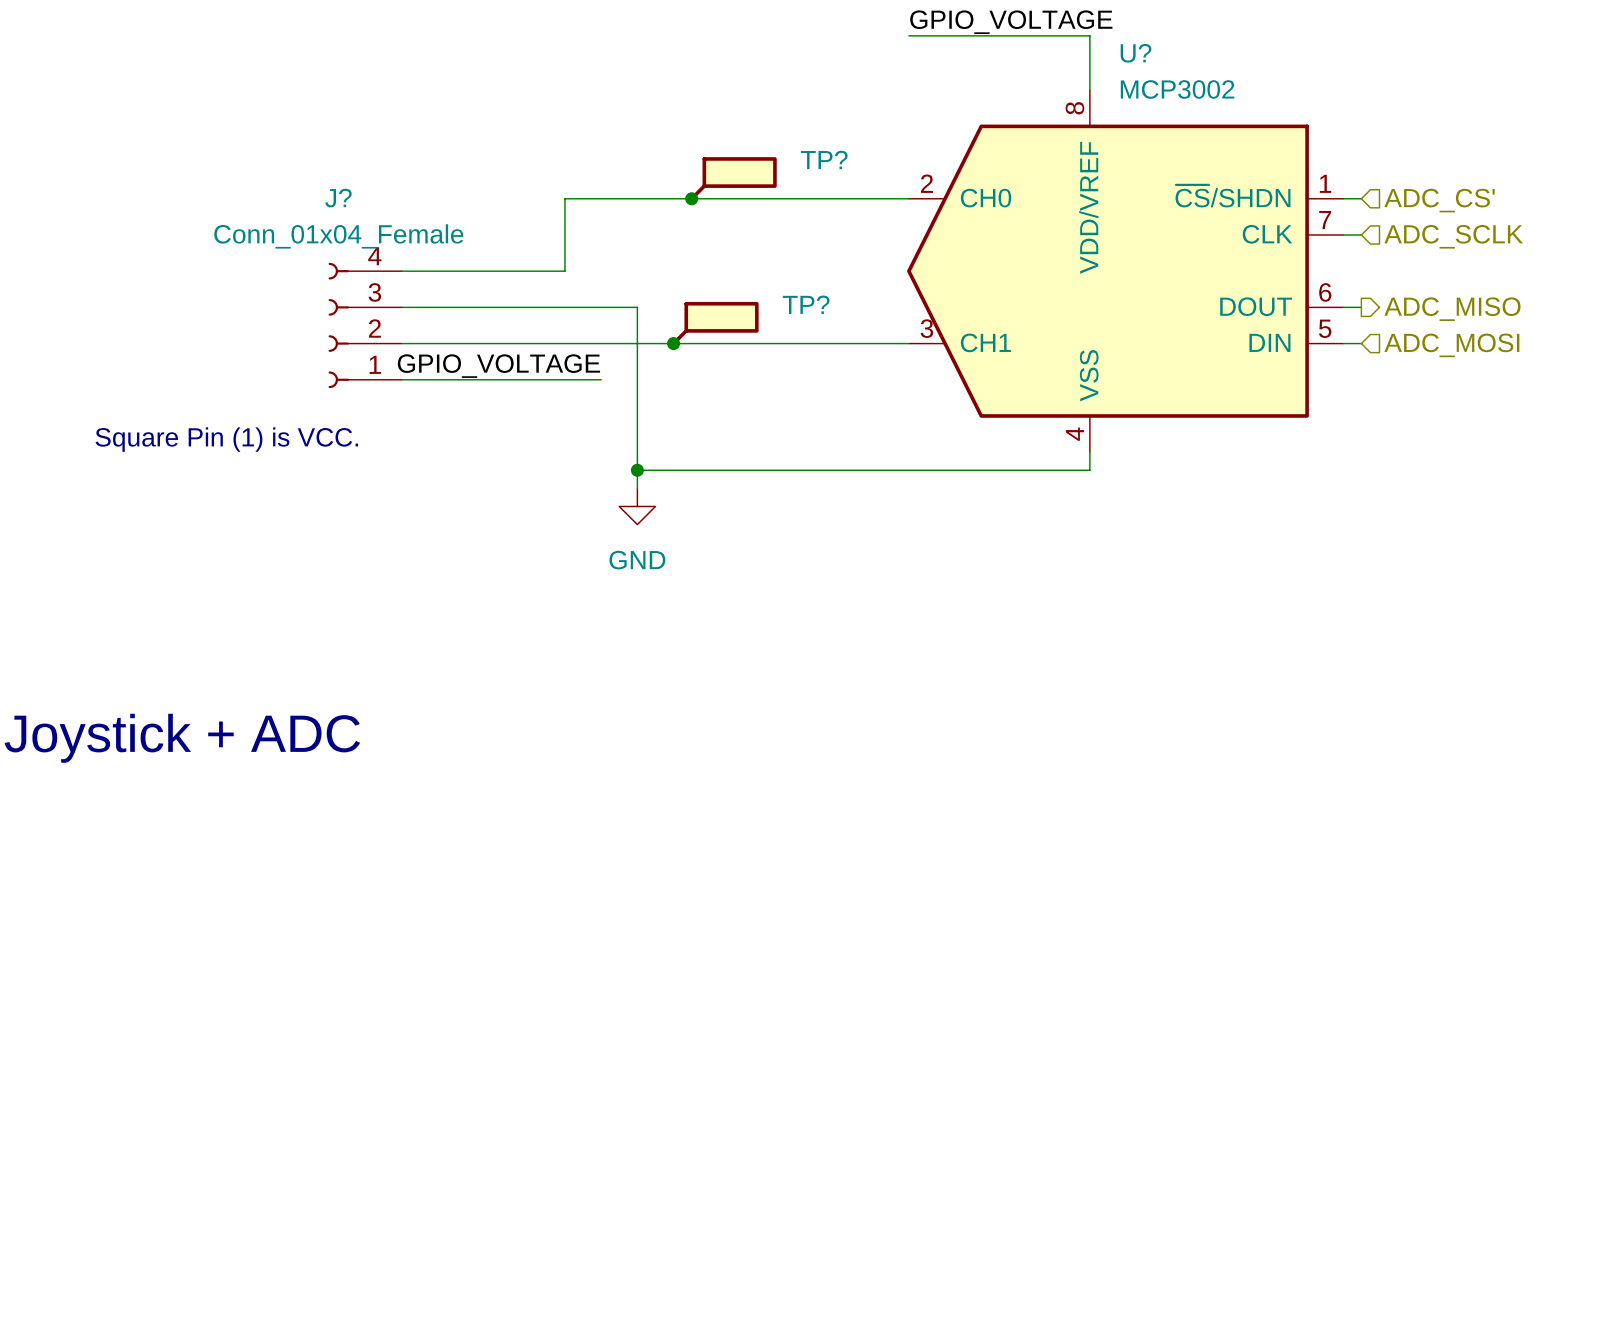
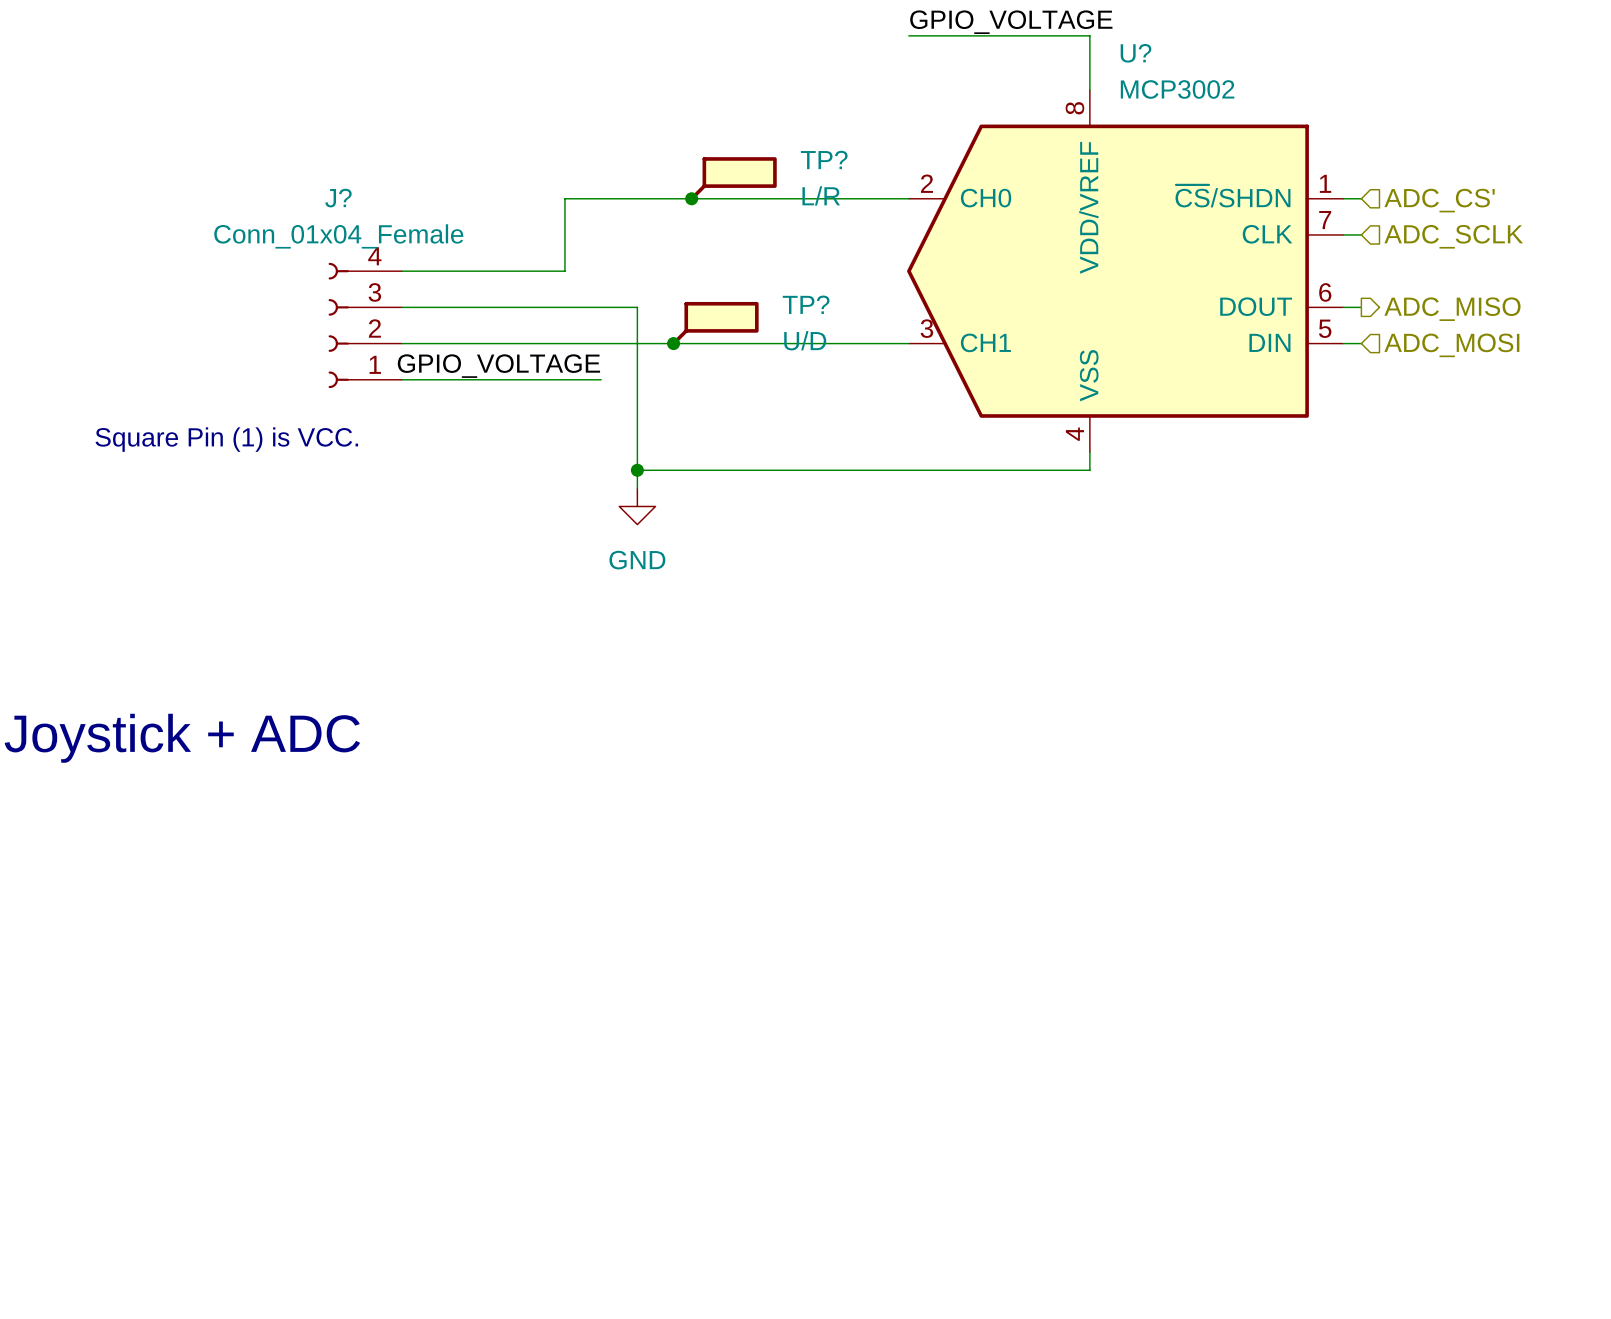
TP? value: none -> L/R (821, 195)
TP? value: none -> U/D (805, 340)

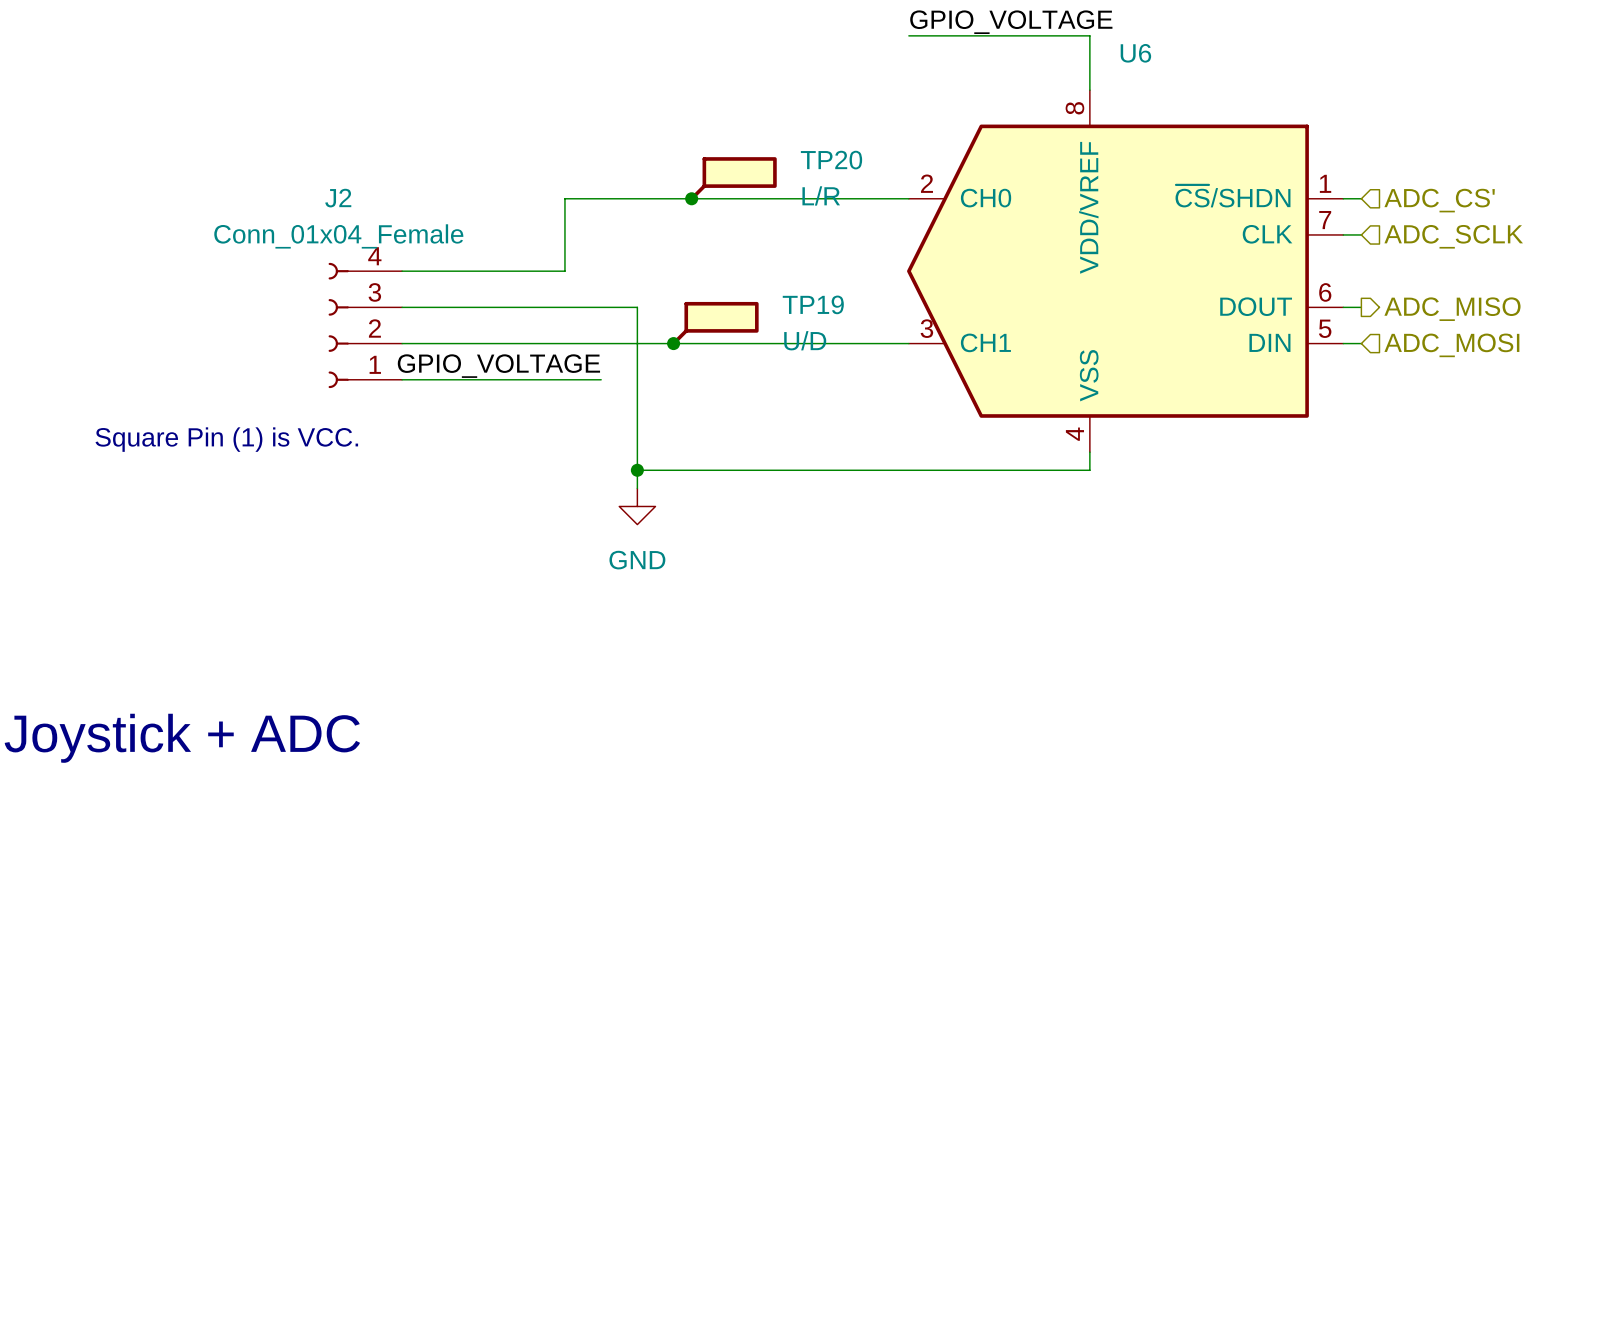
U? name: U? (1136, 53) -> U6 (1135, 53)
U? value: MCP3002 (1177, 89) -> none
TP? name: TP? (824, 159) -> TP20 (831, 160)
J? name: J? (338, 198) -> J2 (338, 198)
TP? name: TP? (806, 304) -> TP19 (813, 304)

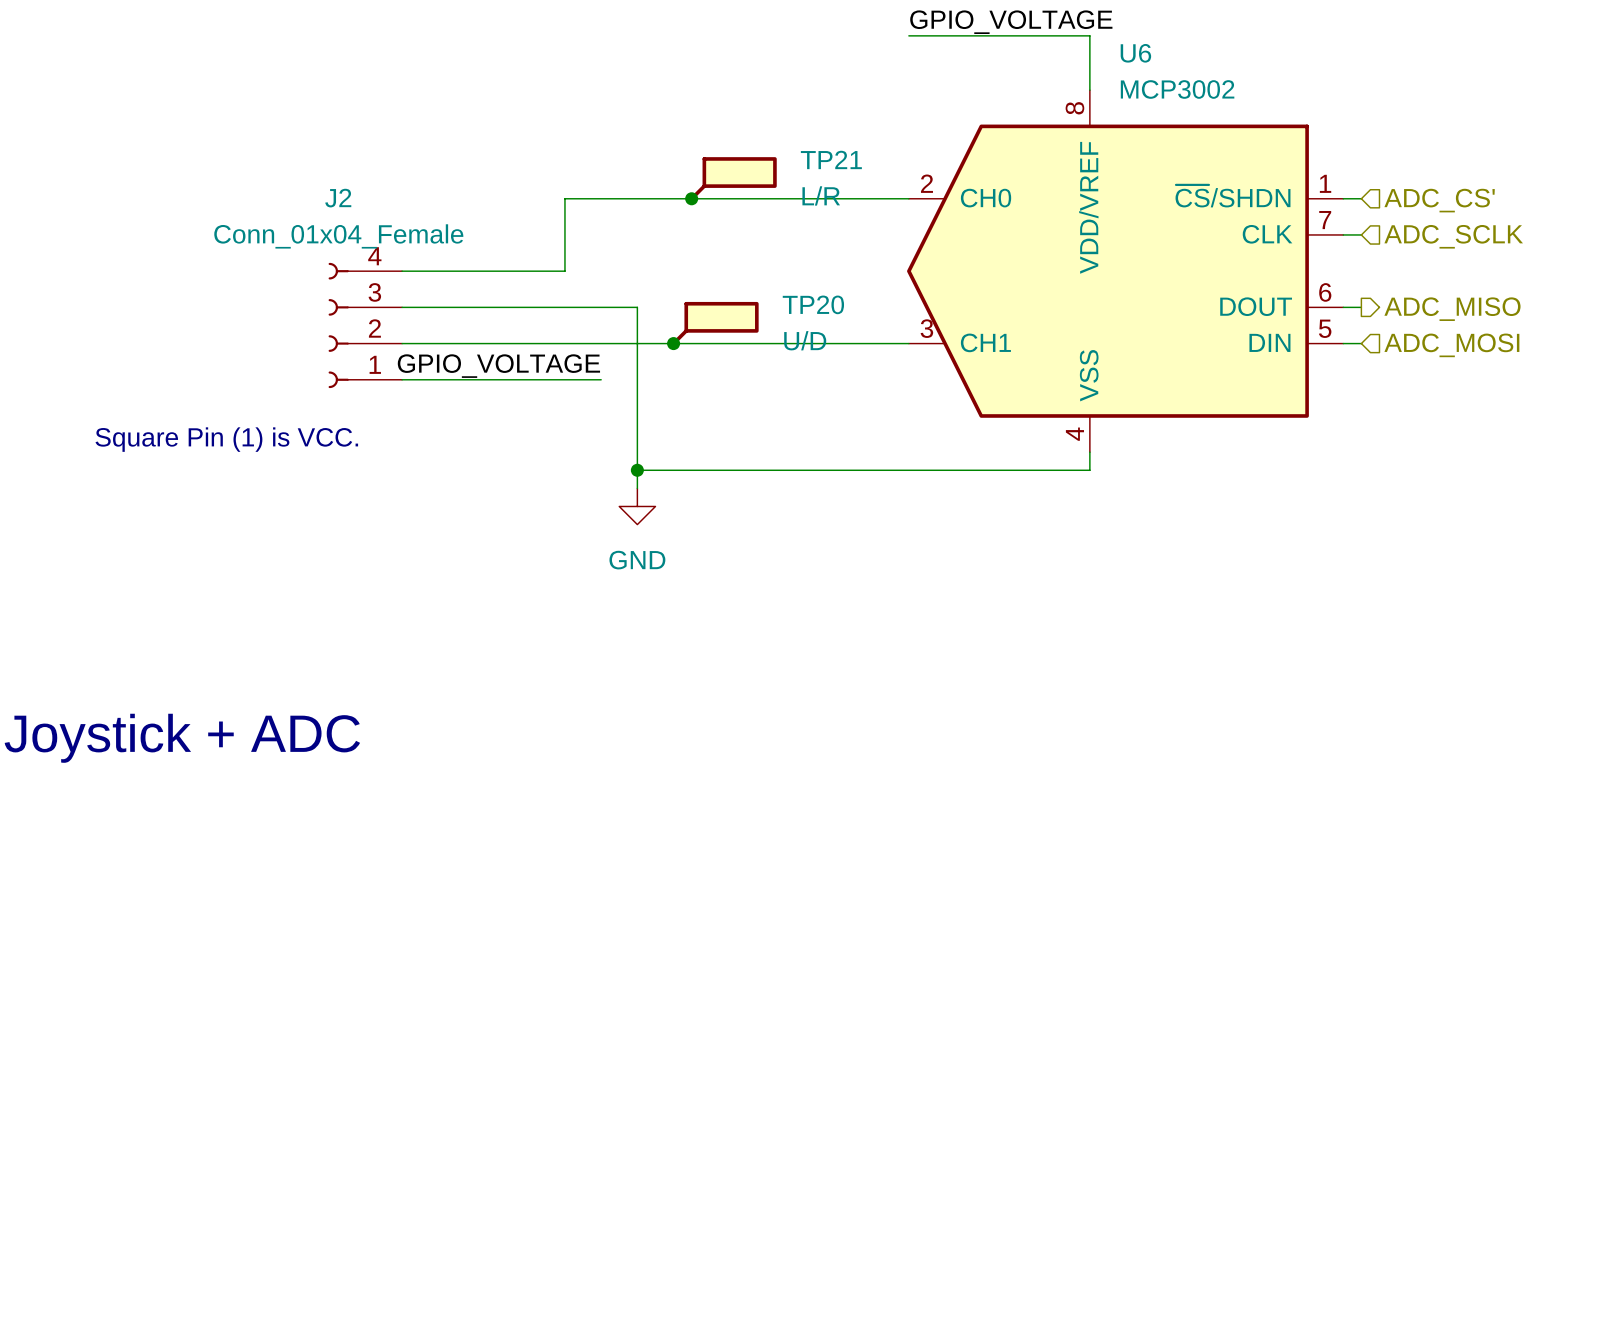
U6 value: none -> MCP3002 (1177, 89)
TP20 name: TP20 (831, 160) -> TP21 (831, 159)
TP19 name: TP19 (813, 304) -> TP20 (813, 304)

